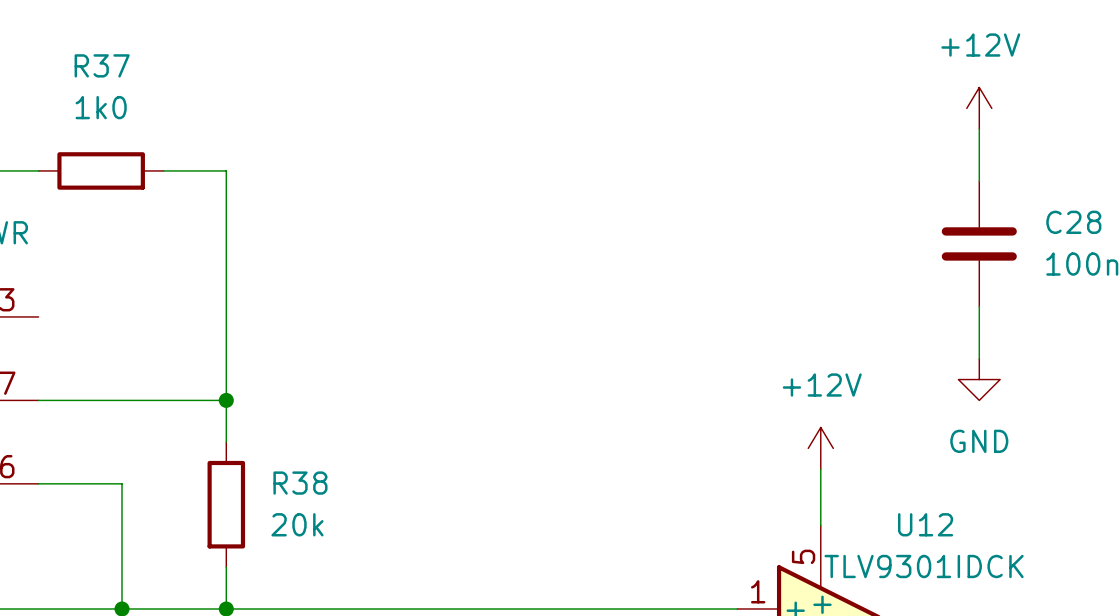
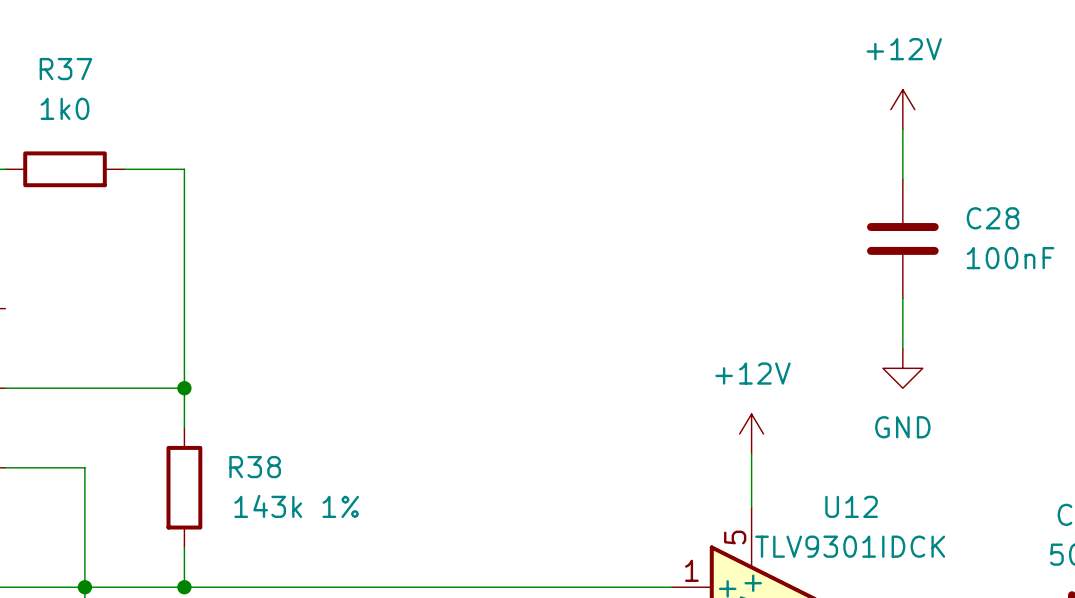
R38 value: 20k (297, 524) -> 143k 1% (296, 506)

